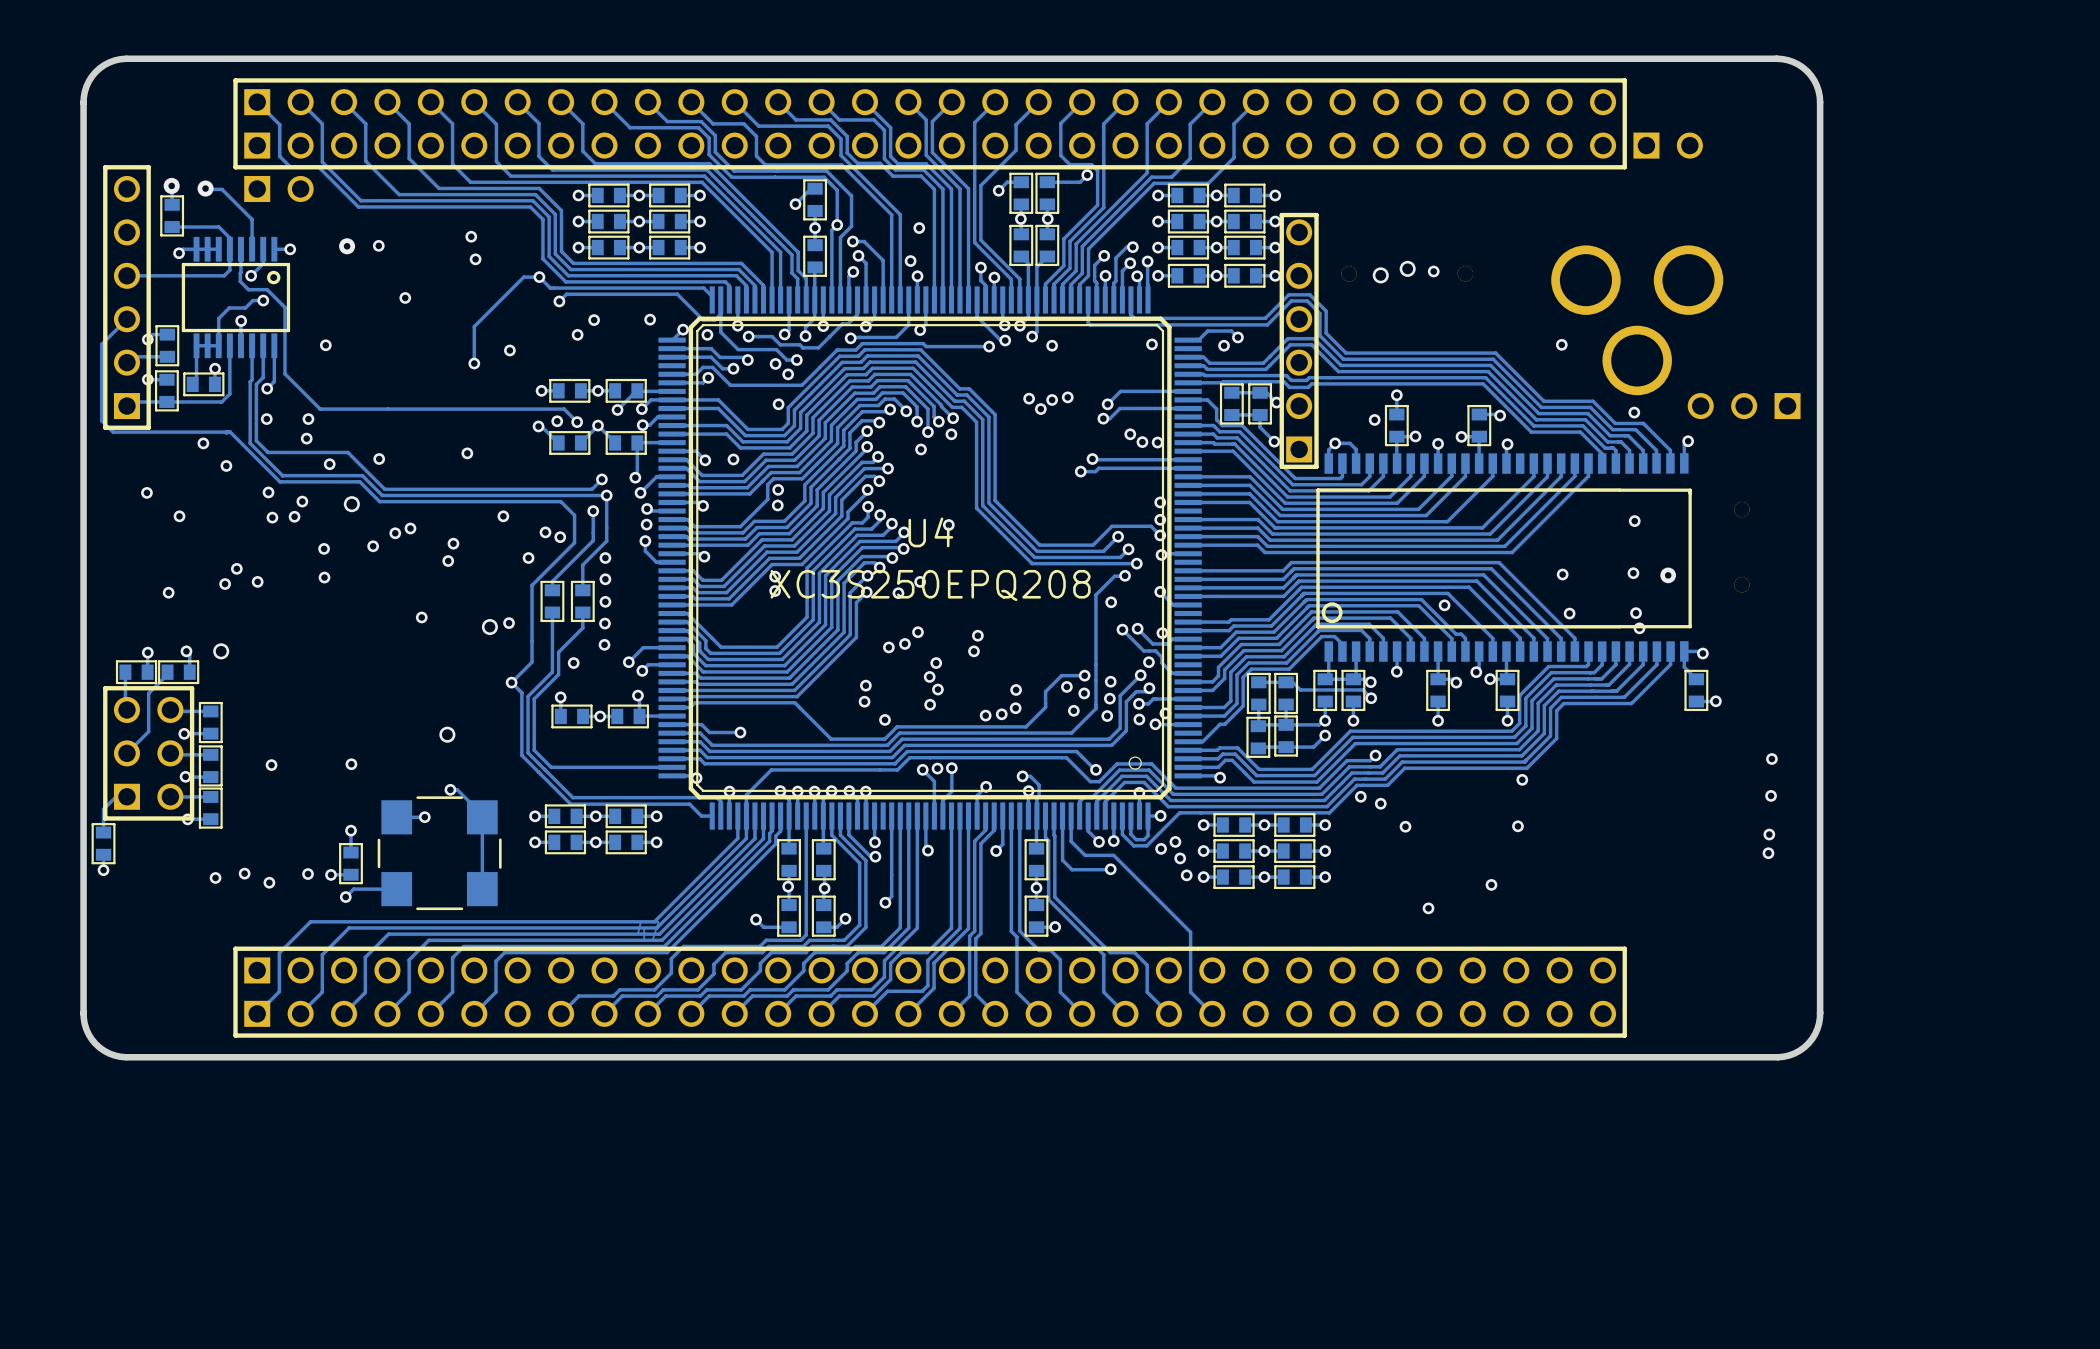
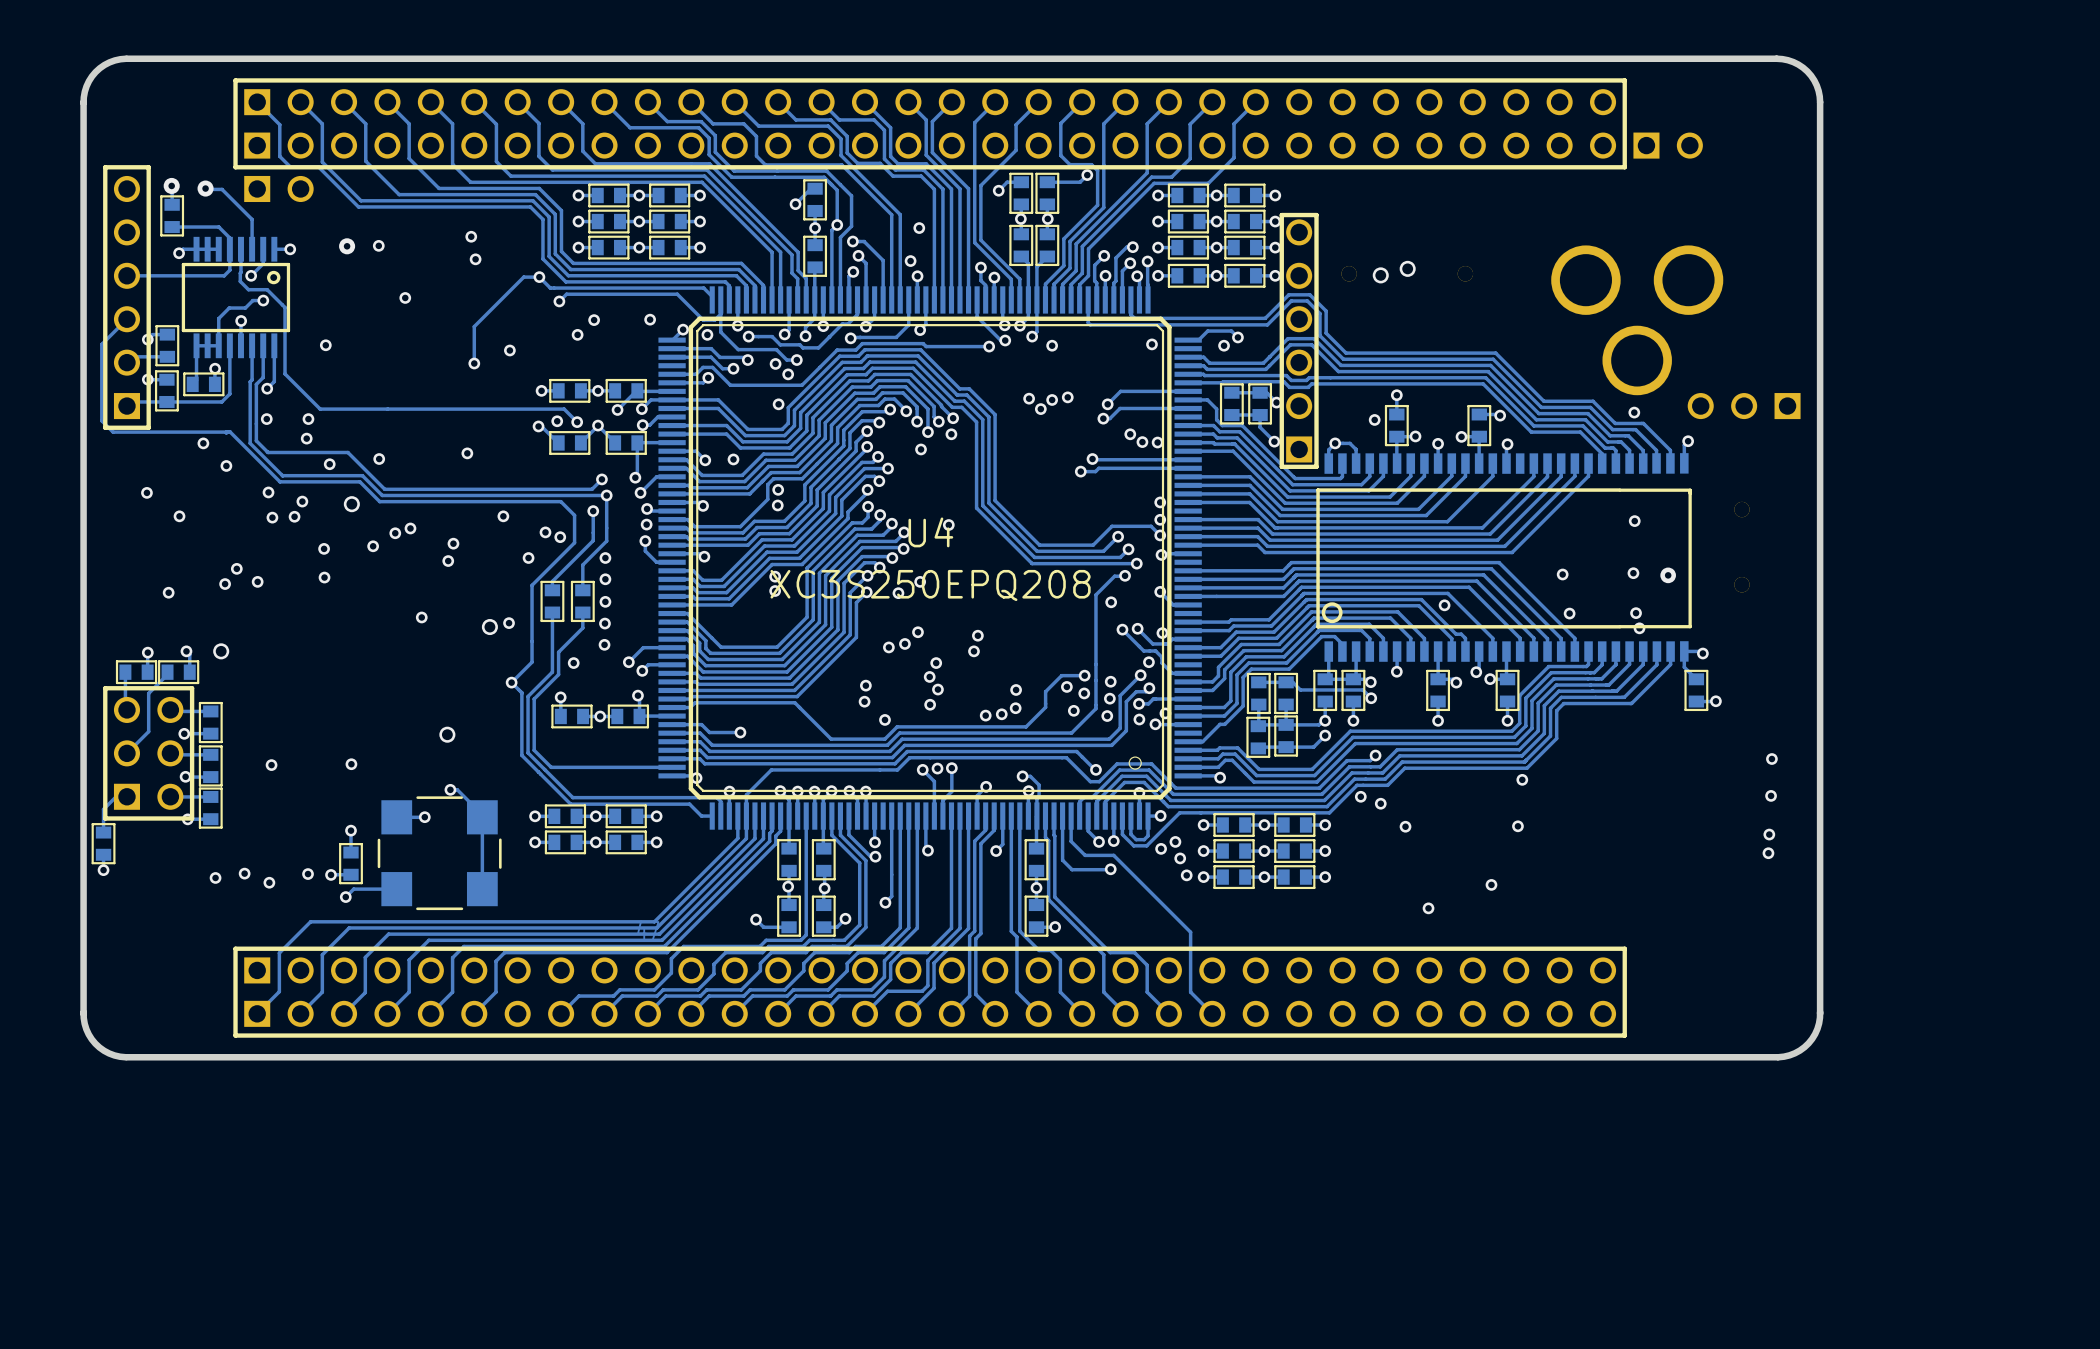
via: (1433, 271) -> none
via: (1561, 344) -> none

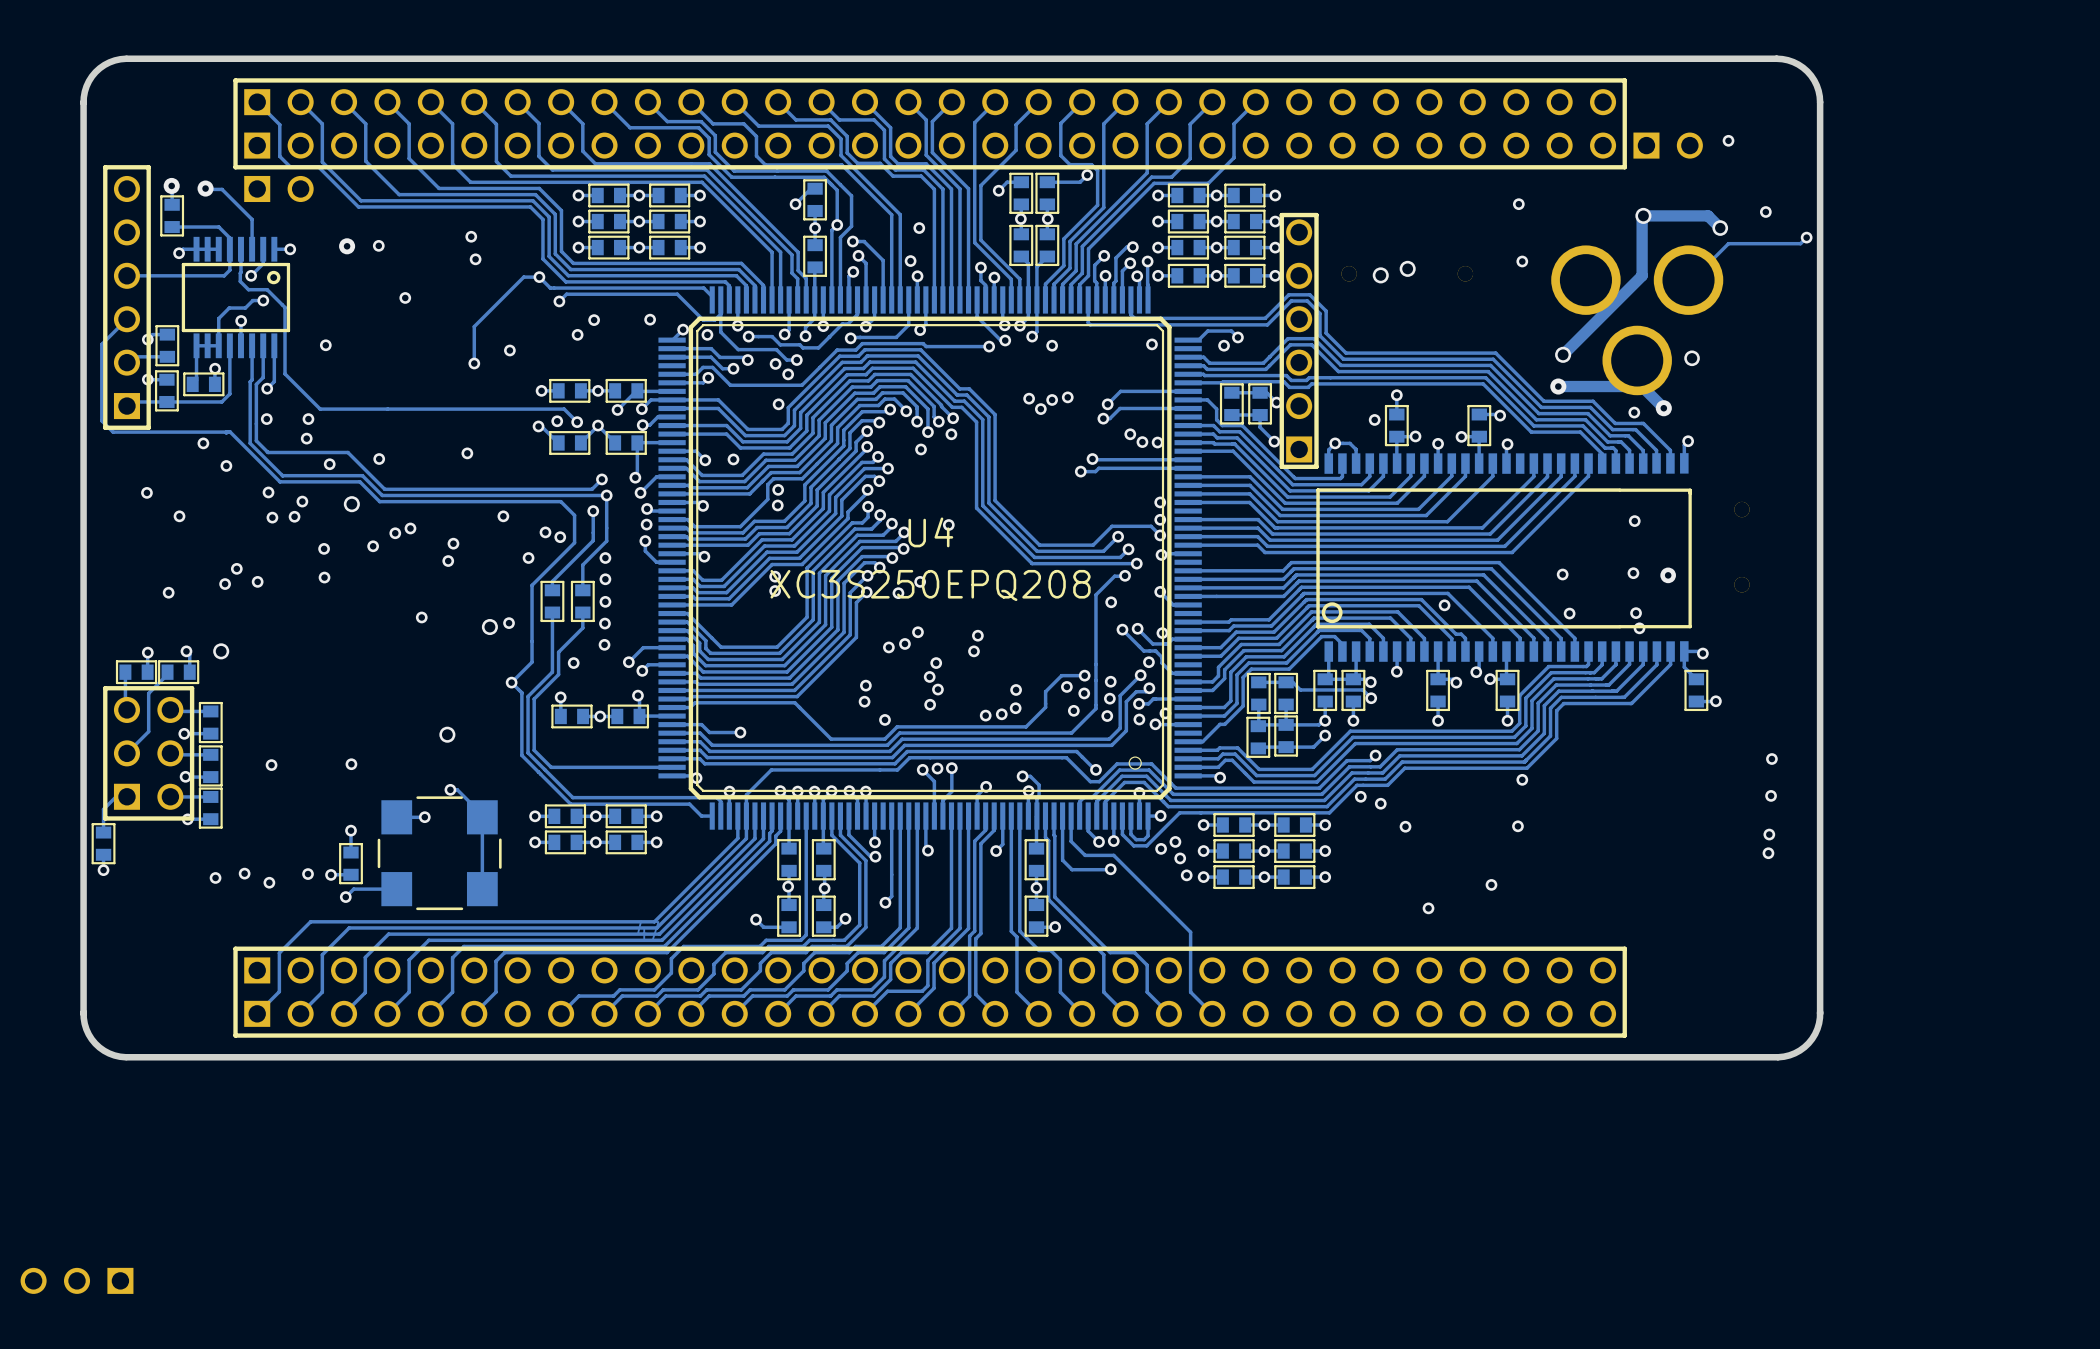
via: none -> (1728, 140)
via: none -> (1518, 204)
via: none -> (1765, 212)
via: none -> (1643, 215)
track: none -> (1720, 228) (1708, 215) (1643, 215) (1642, 275) (1563, 354)
via: none -> (1720, 228)
track: none -> (1806, 237) (1800, 243) (1728, 243) (1692, 280)
via: none -> (1806, 237)
via: none -> (1522, 261)
via: none -> (1563, 354)
via: none -> (1692, 358)
track: none -> (1558, 386) (1642, 386) (1663, 408)
via: none -> (1558, 386)
part: (1744, 406) -> none
via: none -> (1663, 408)
part: none -> (77, 1280)

